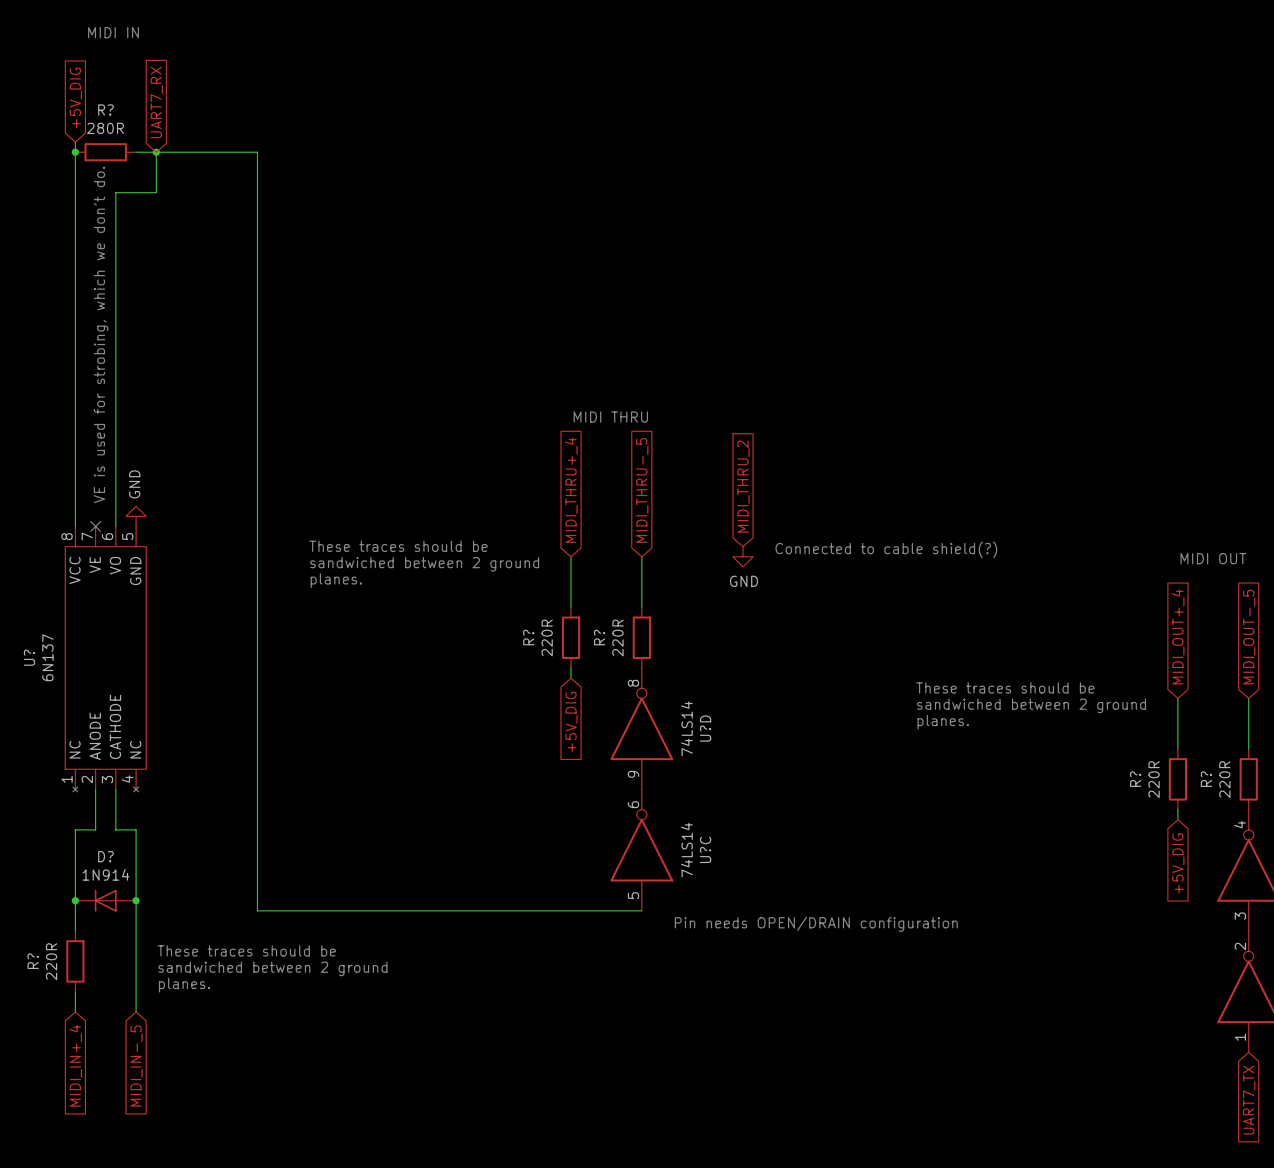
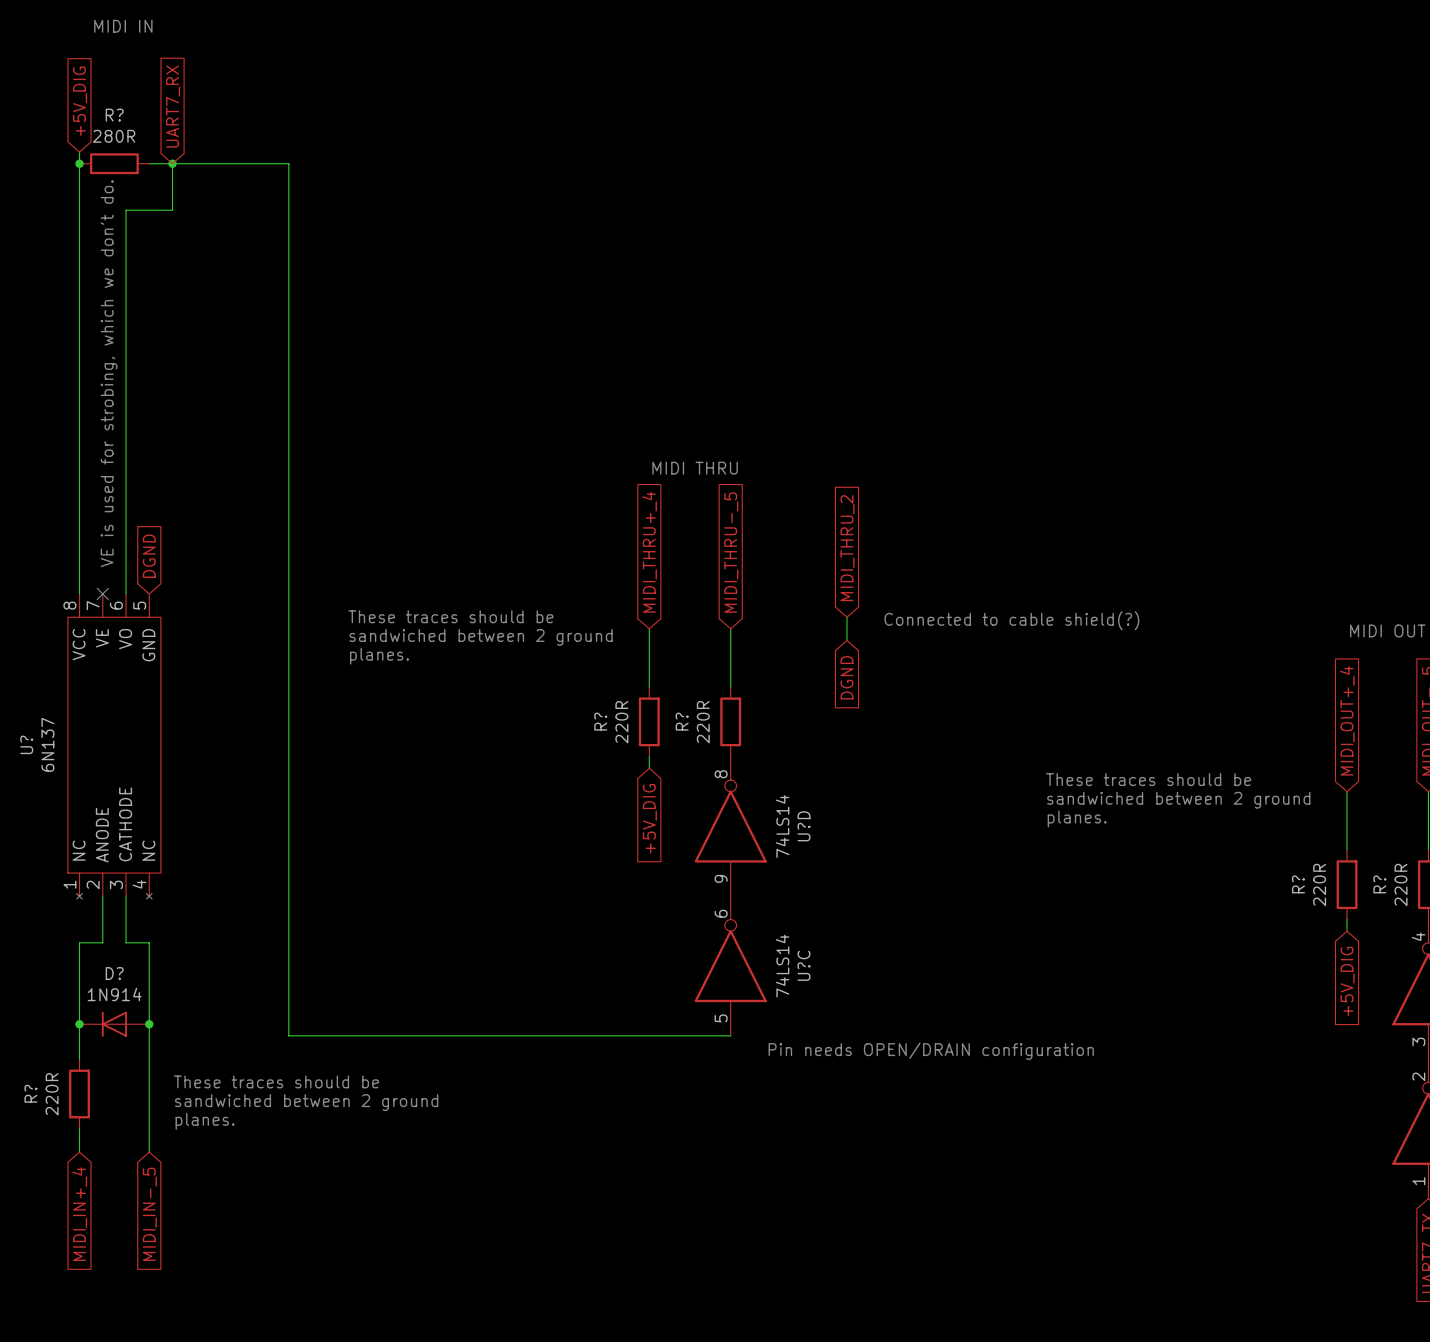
global label: none -> DGND (149, 556)
power symbol: GND (136, 516) -> none
power symbol: GND (742, 556) -> none
global label: none -> DGND (847, 677)

